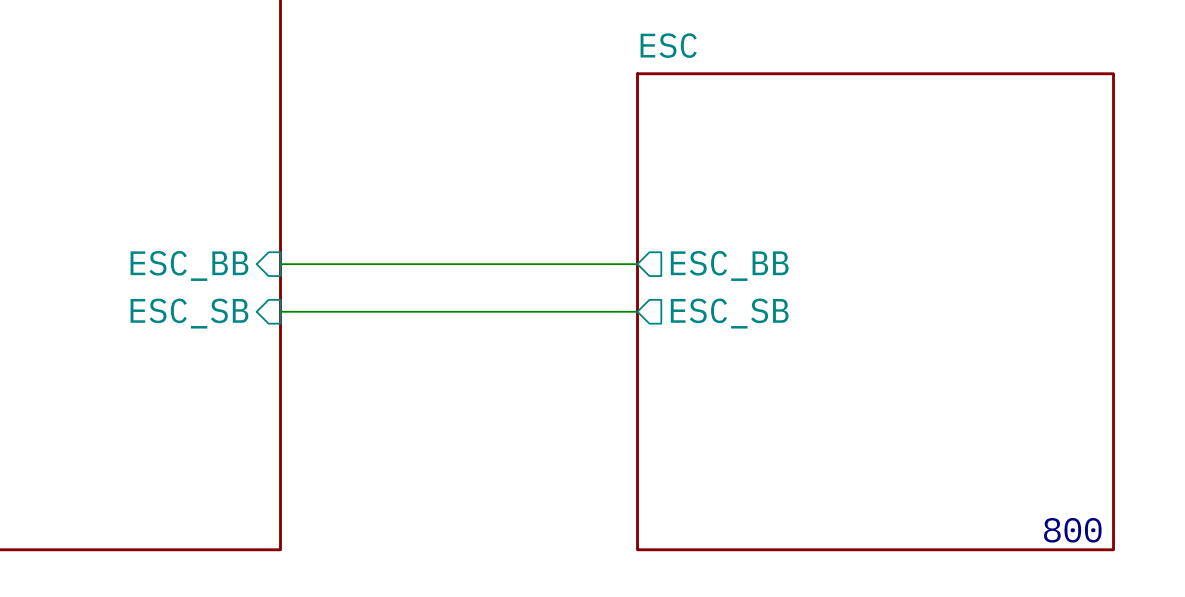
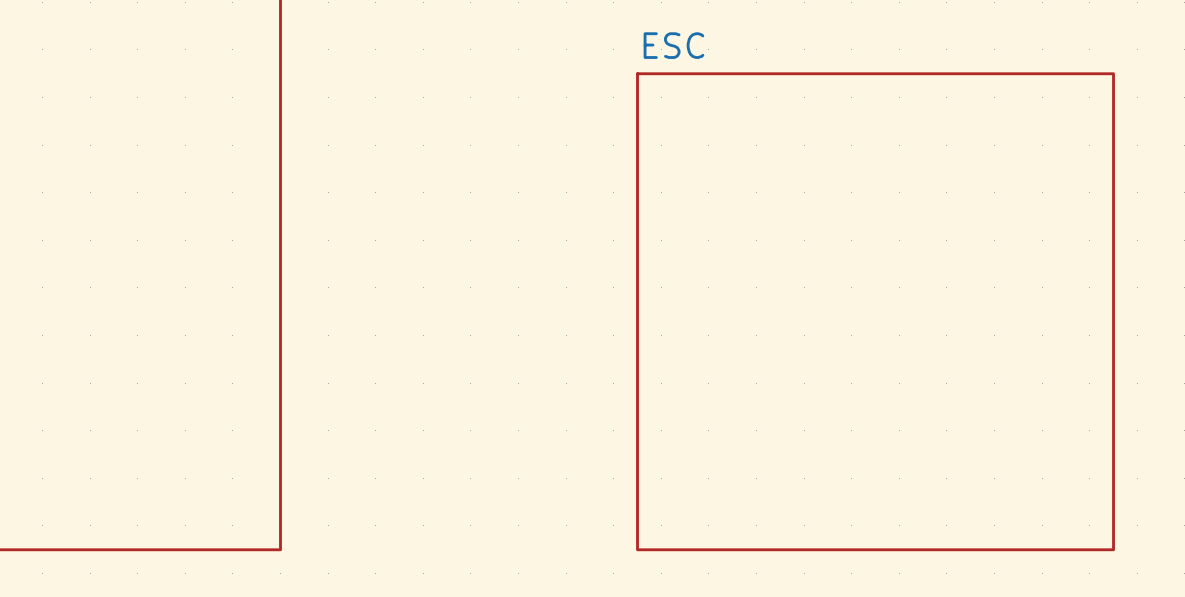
wire: (280, 264) (637, 264) -> none
sheet pin: ESC_BB (189, 265) -> none
sheet pin: ESC_BB (729, 265) -> none
wire: (280, 311) (637, 311) -> none
sheet pin: ESC_SB (189, 313) -> none
sheet pin: ESC_SB (729, 313) -> none
text: 800 (1072, 530) -> none

